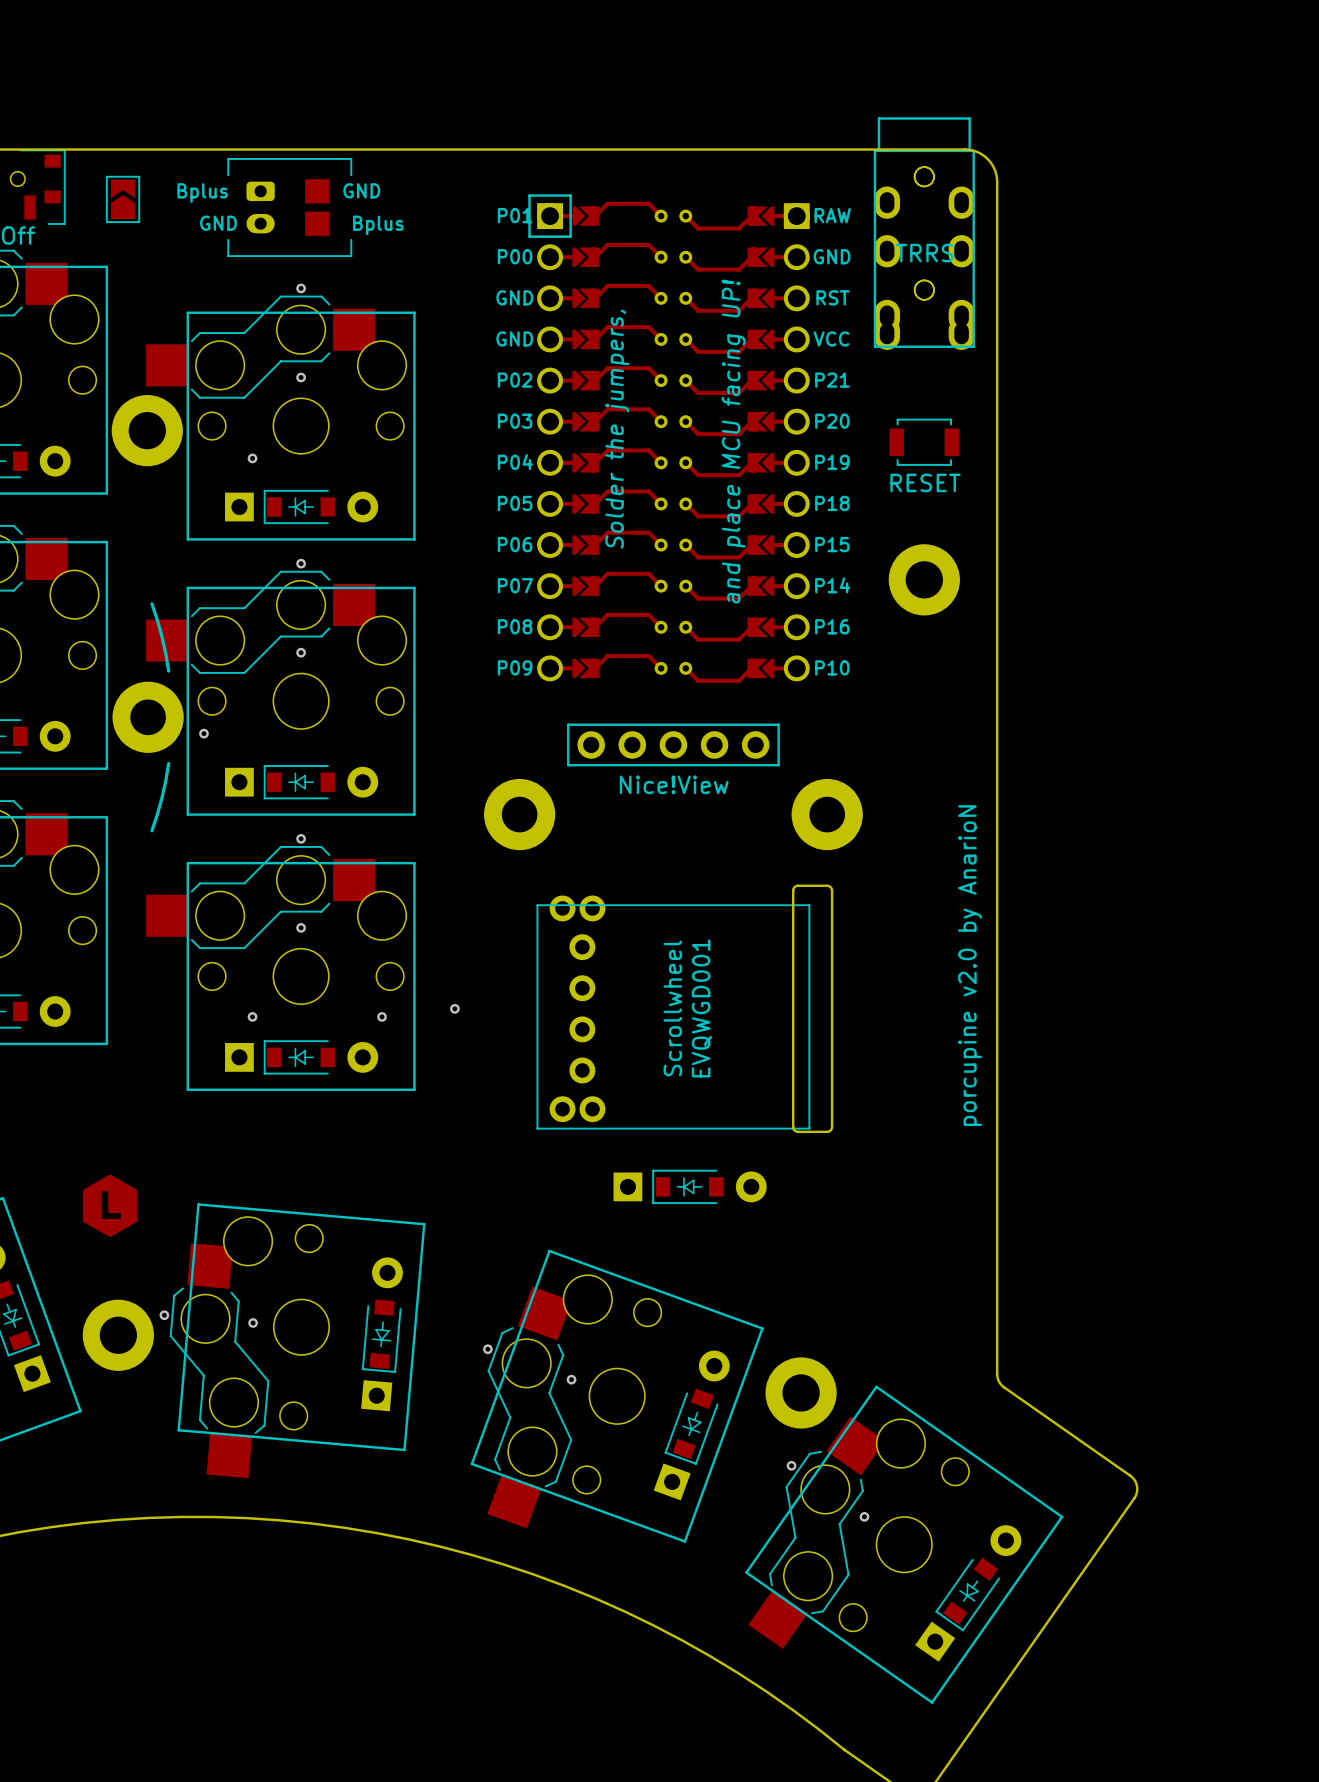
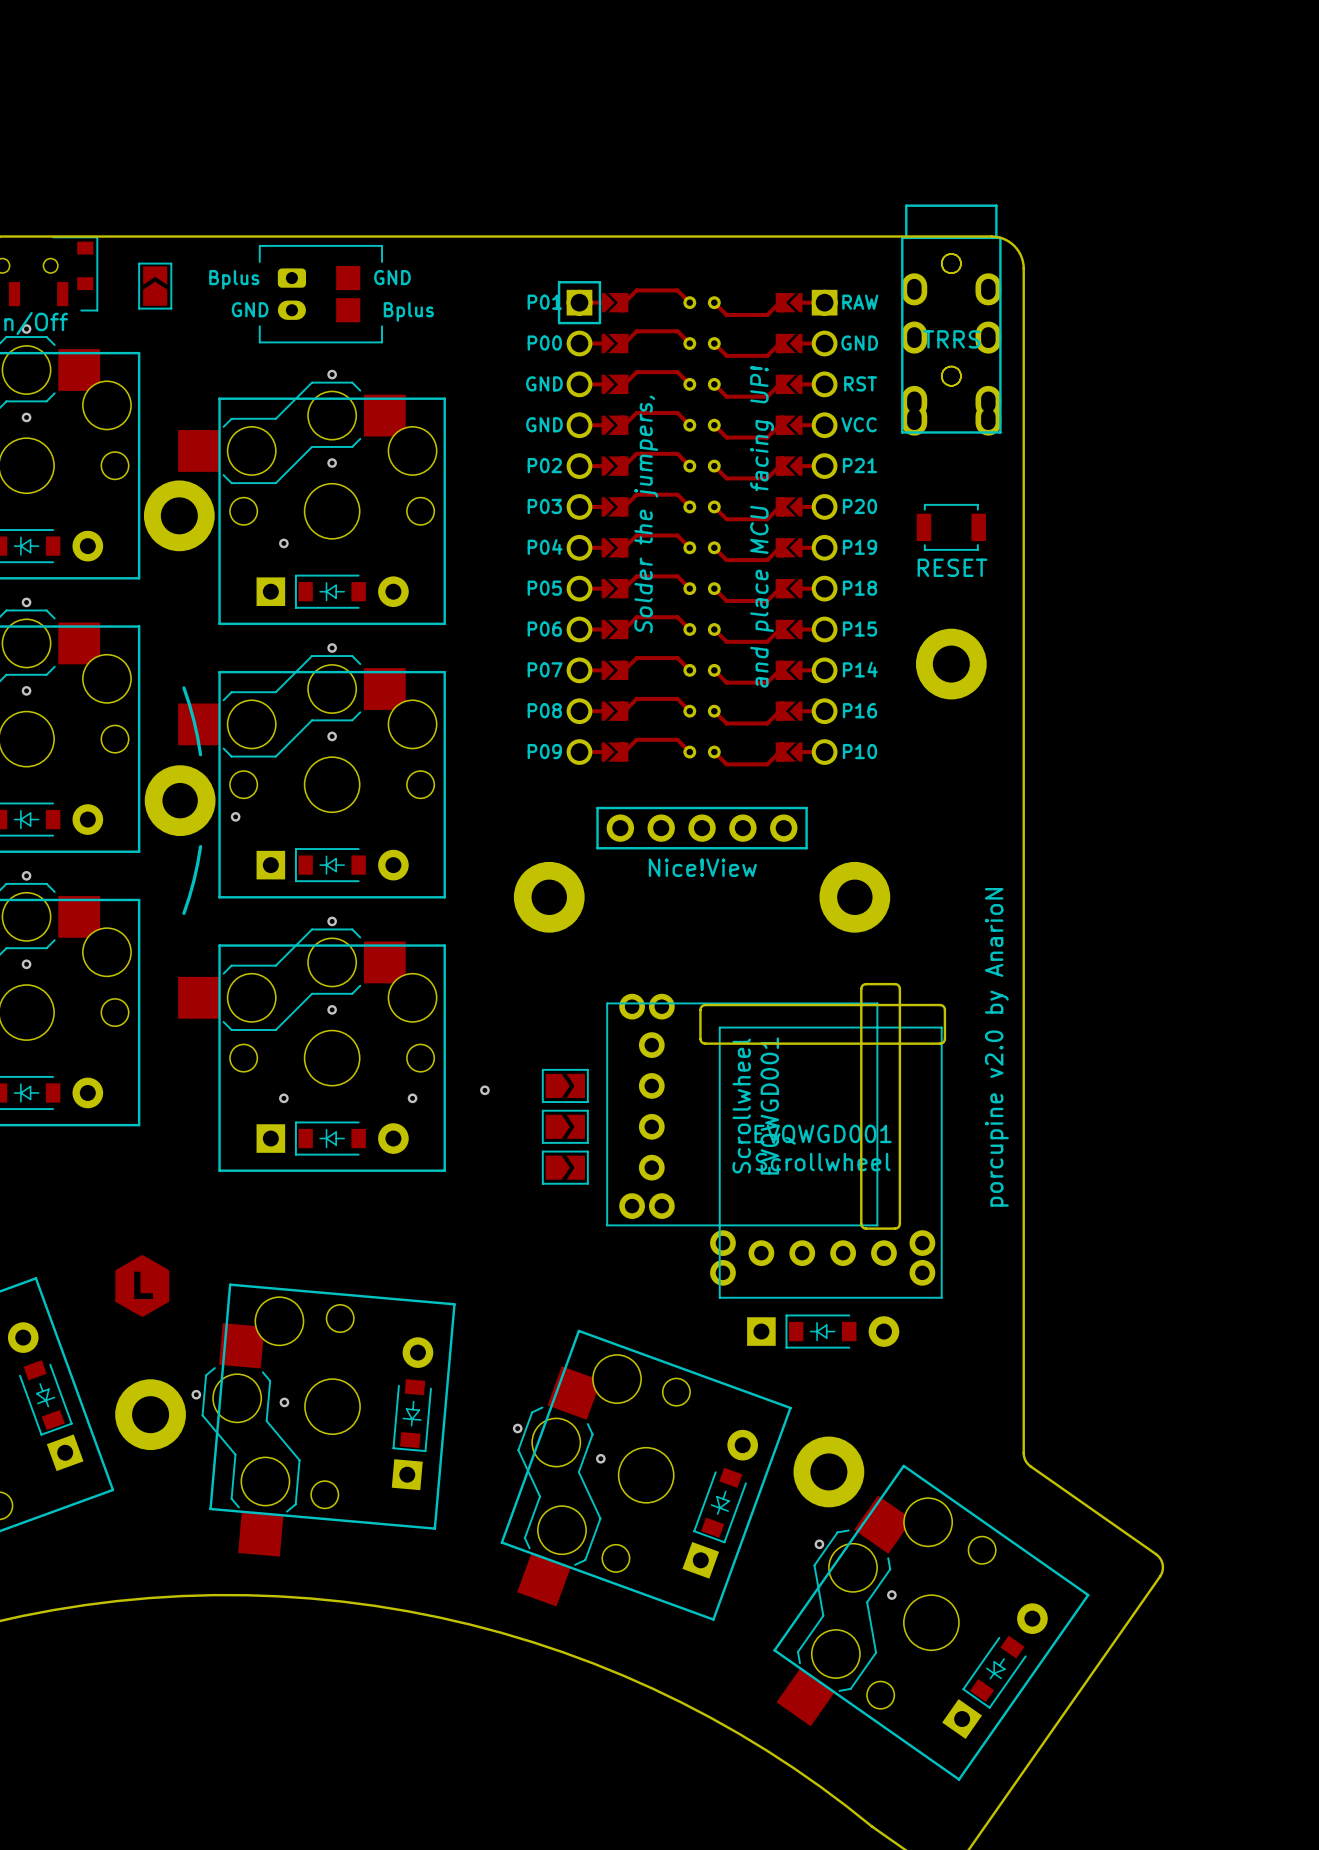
part: none -> (565, 1085)
part position: (684, 1008) -> (753, 1106)
part: none -> (565, 1126)
part: none -> (822, 1151)
part: none -> (565, 1167)
part position: (690, 1186) -> (823, 1331)

